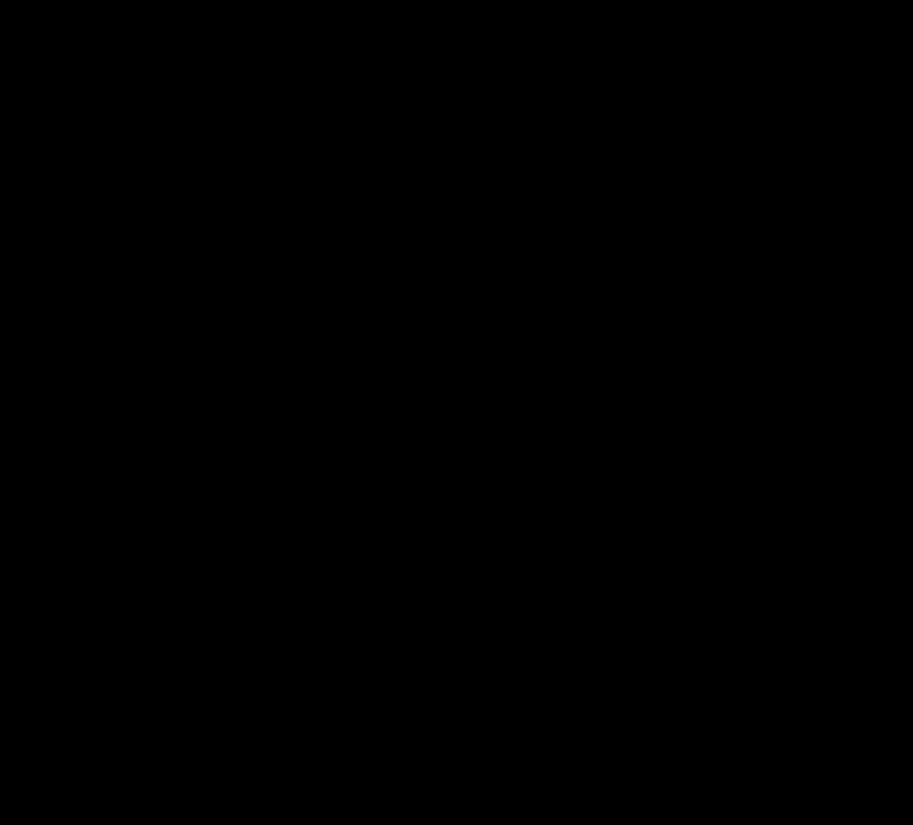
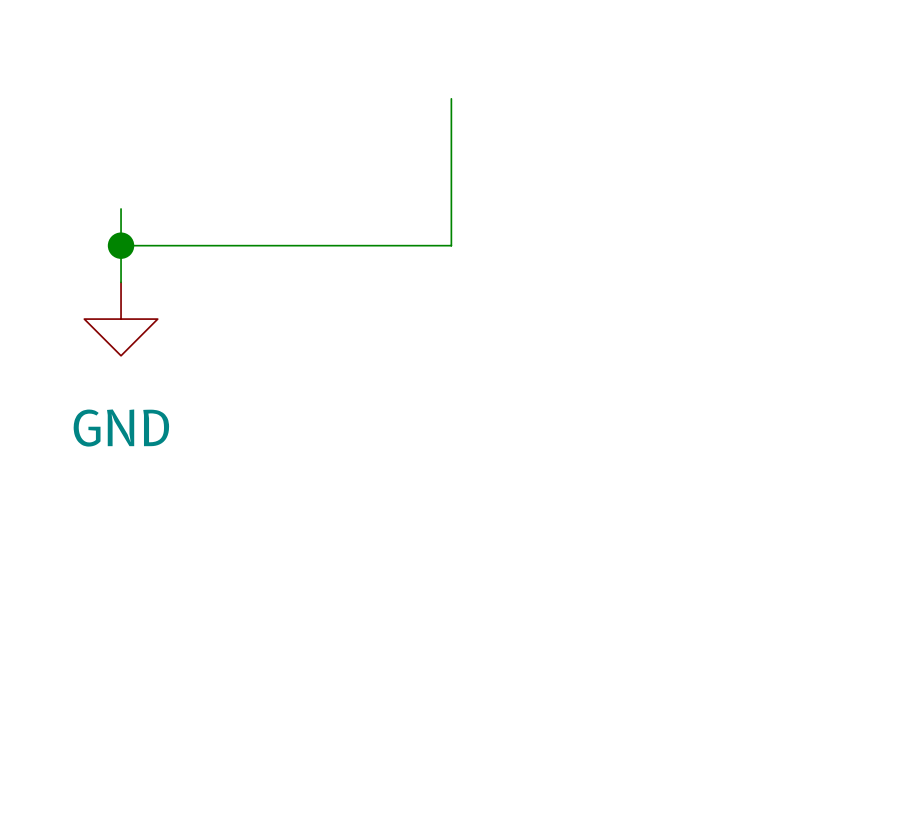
wire: none -> (451, 98) (451, 245) (121, 245)
wire: none -> (121, 208) (121, 282)
junction: none -> (121, 245)
power symbol: none -> GND (121, 319)

